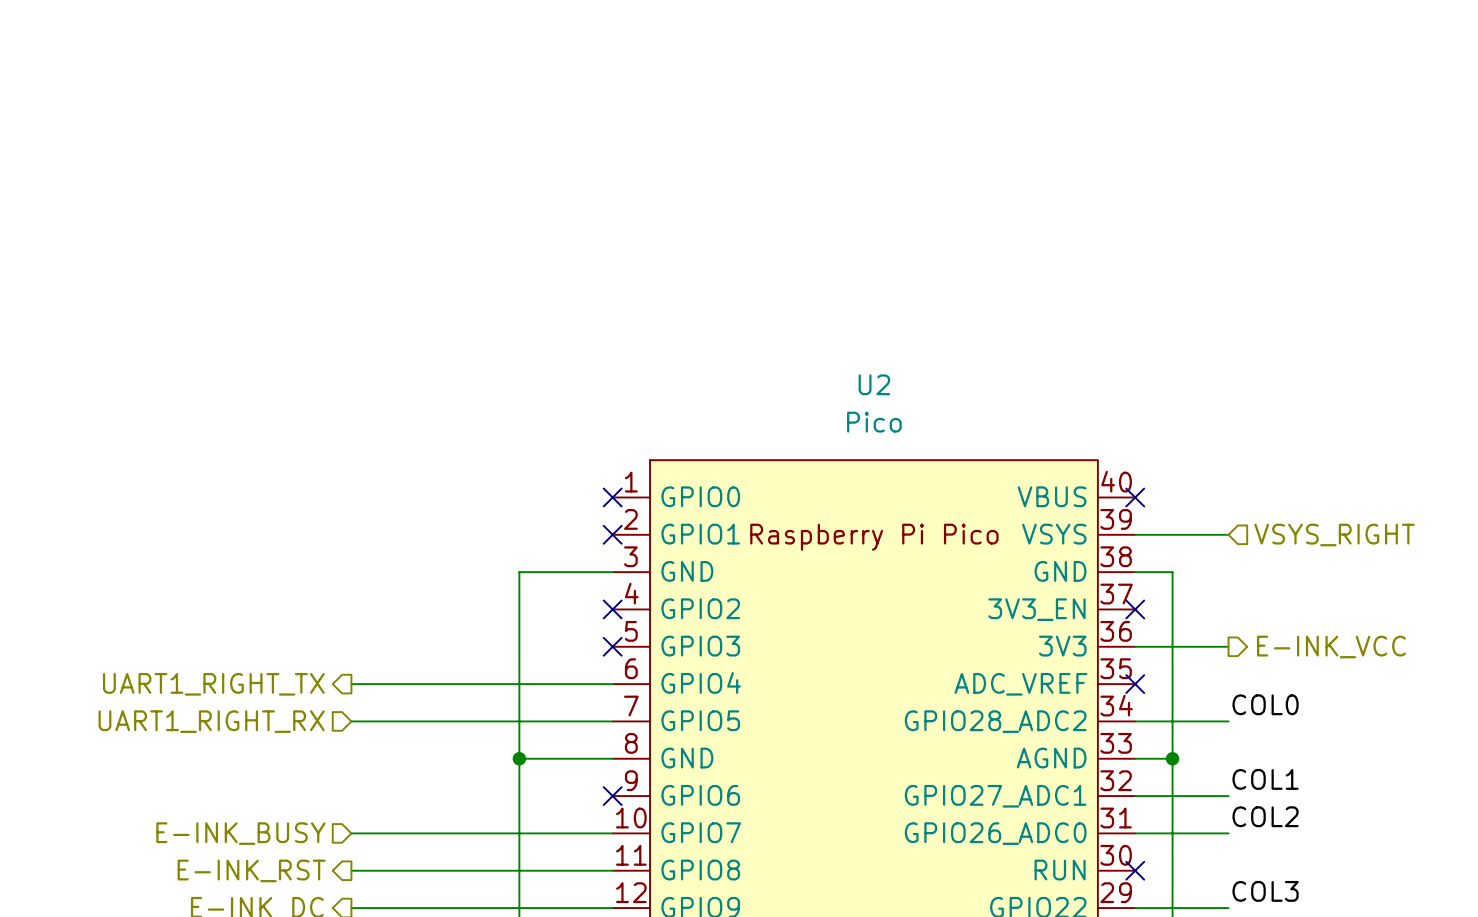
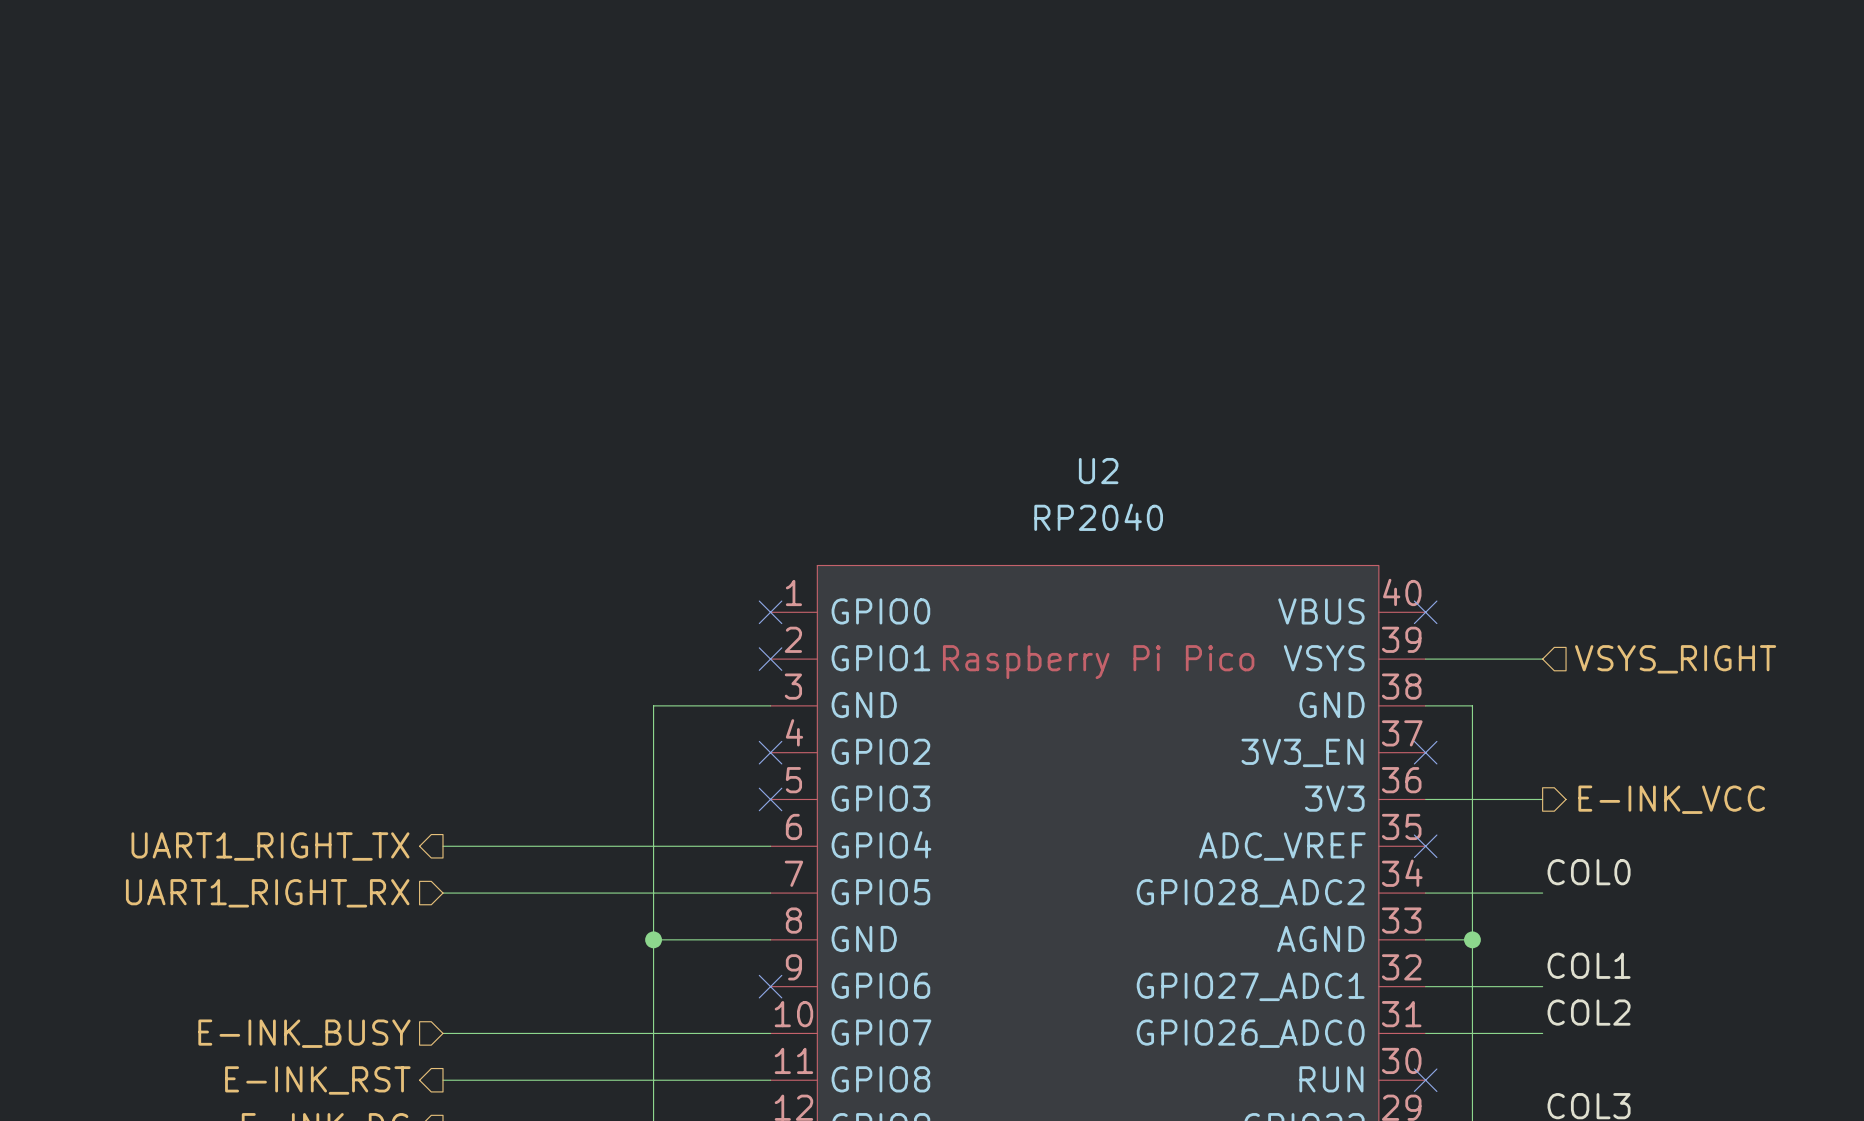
U2 value: Pico (874, 422) -> RP2040 (1098, 517)

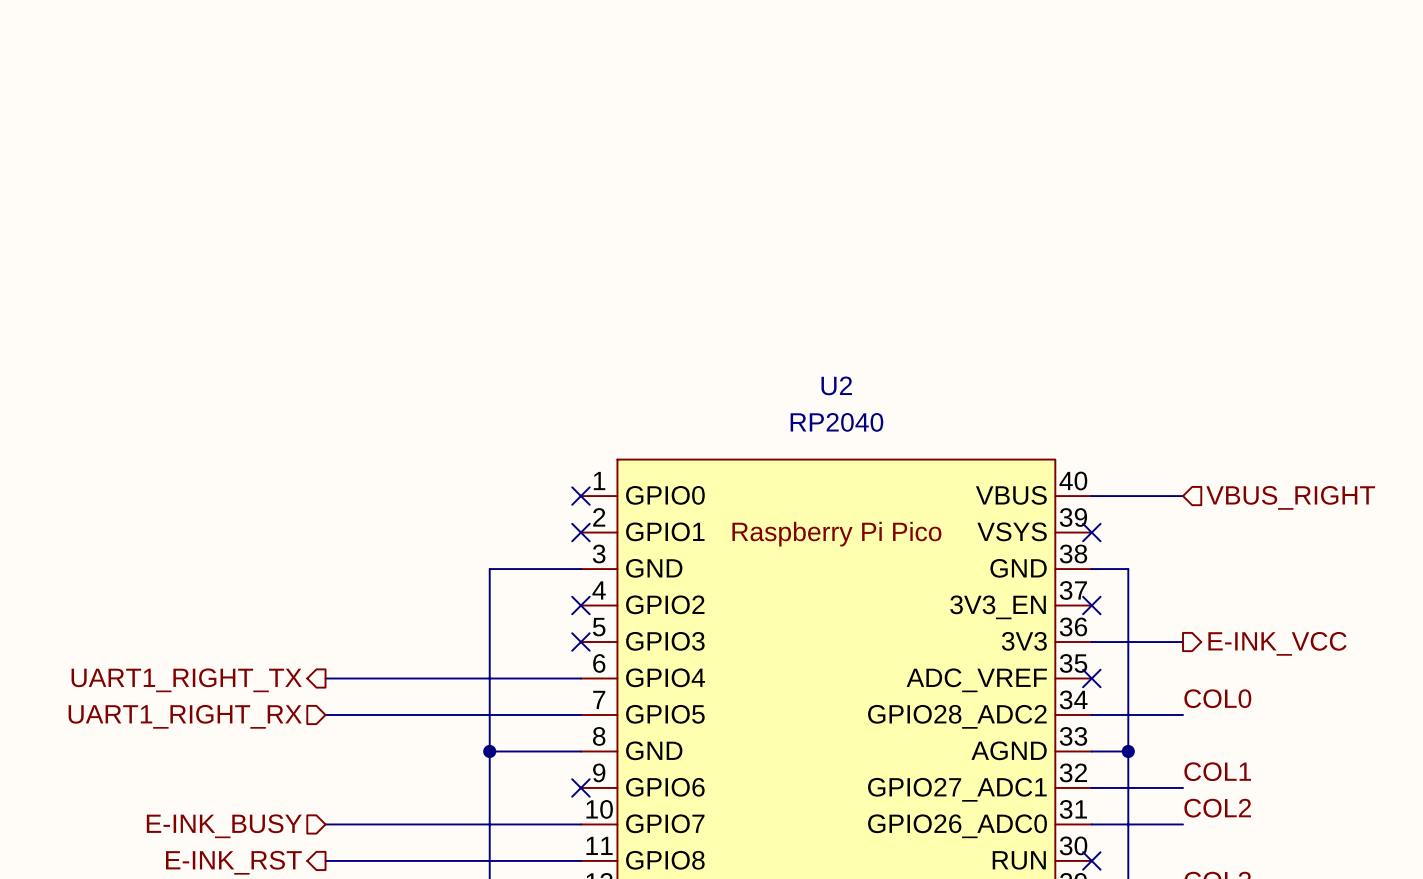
no-connect mark position: (1425, 612) -> (1091, 532)
wire: (1425, 659) (1542, 659) -> (1091, 496) (1183, 496)
hierarchical label: VSYS_RIGHT (1675, 659) -> VBUS_RIGHT (1290, 497)

